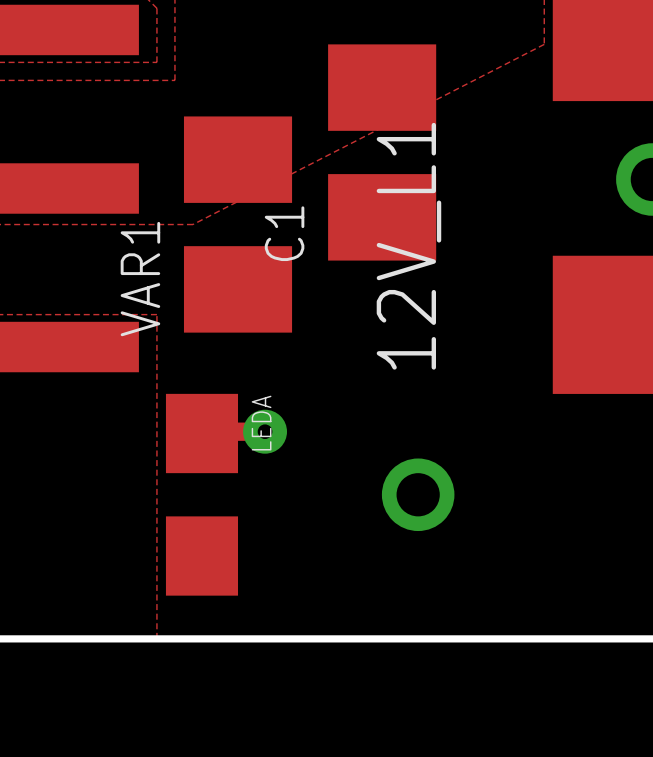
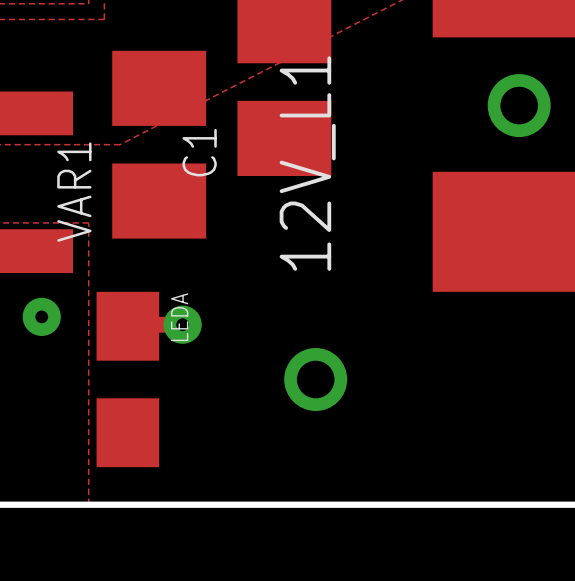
via: none -> (41, 316)

